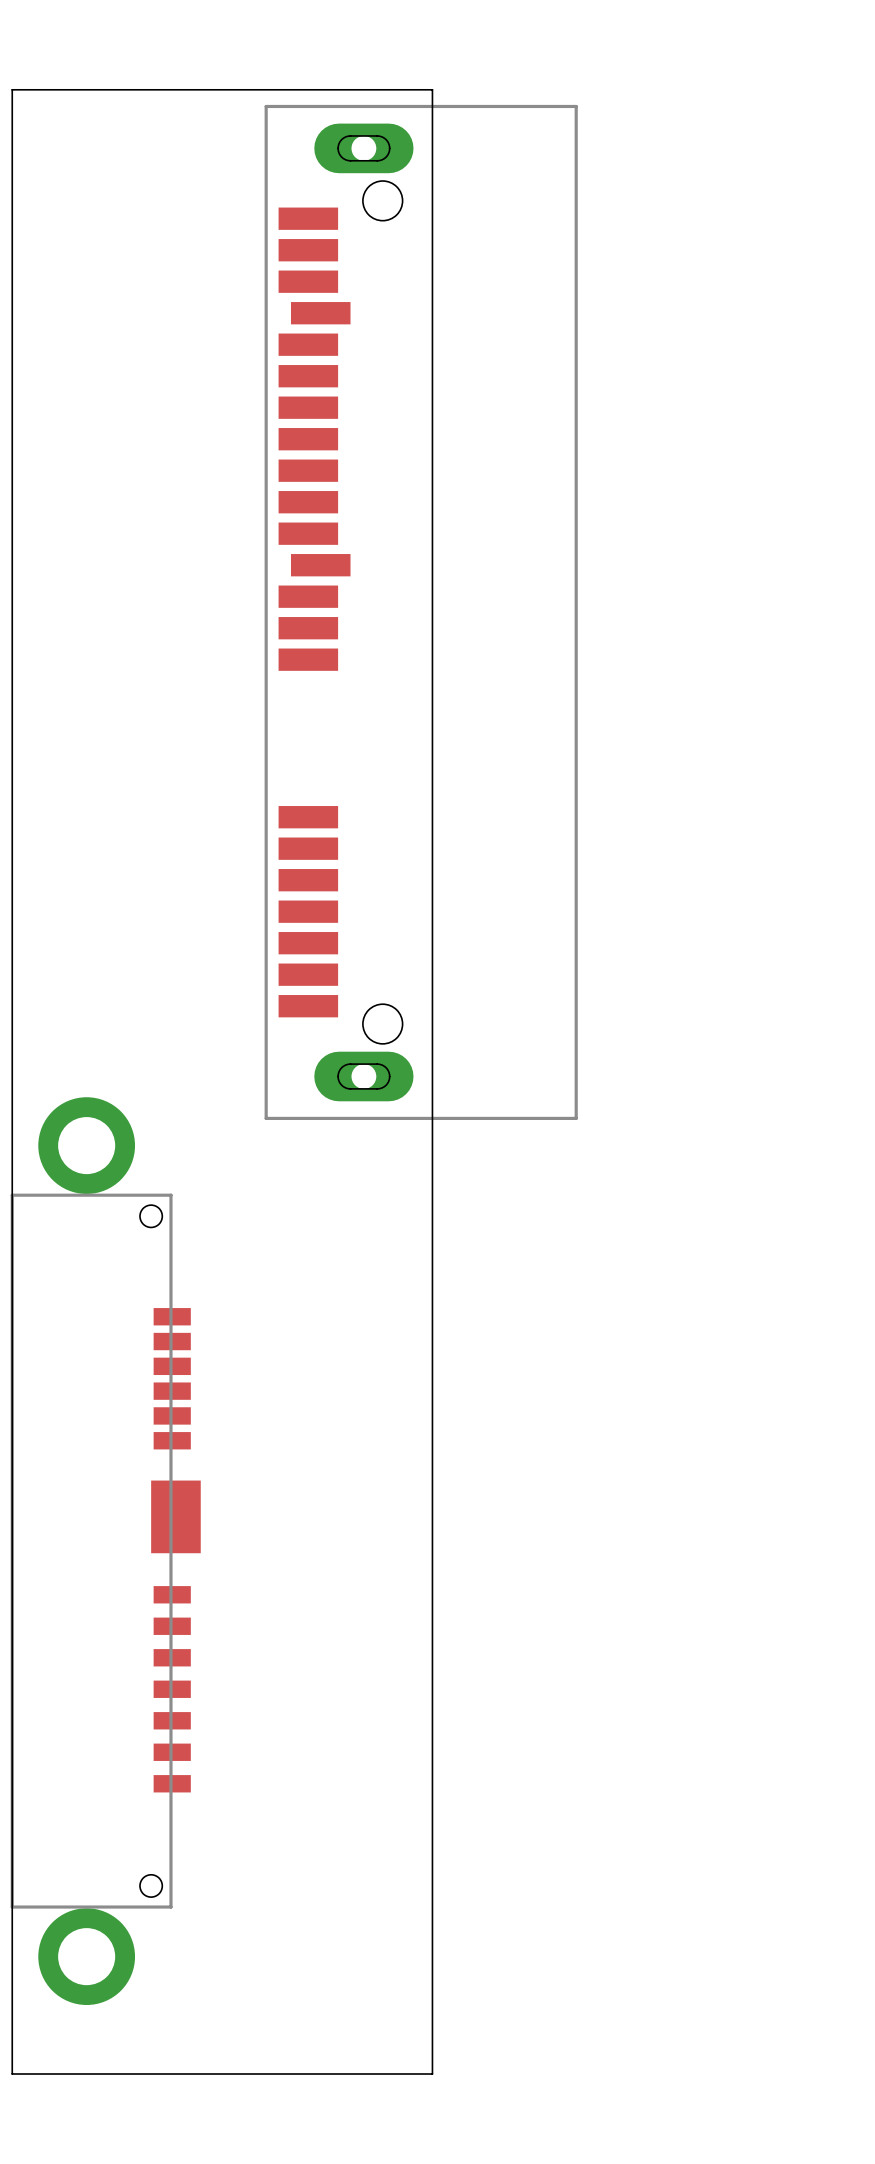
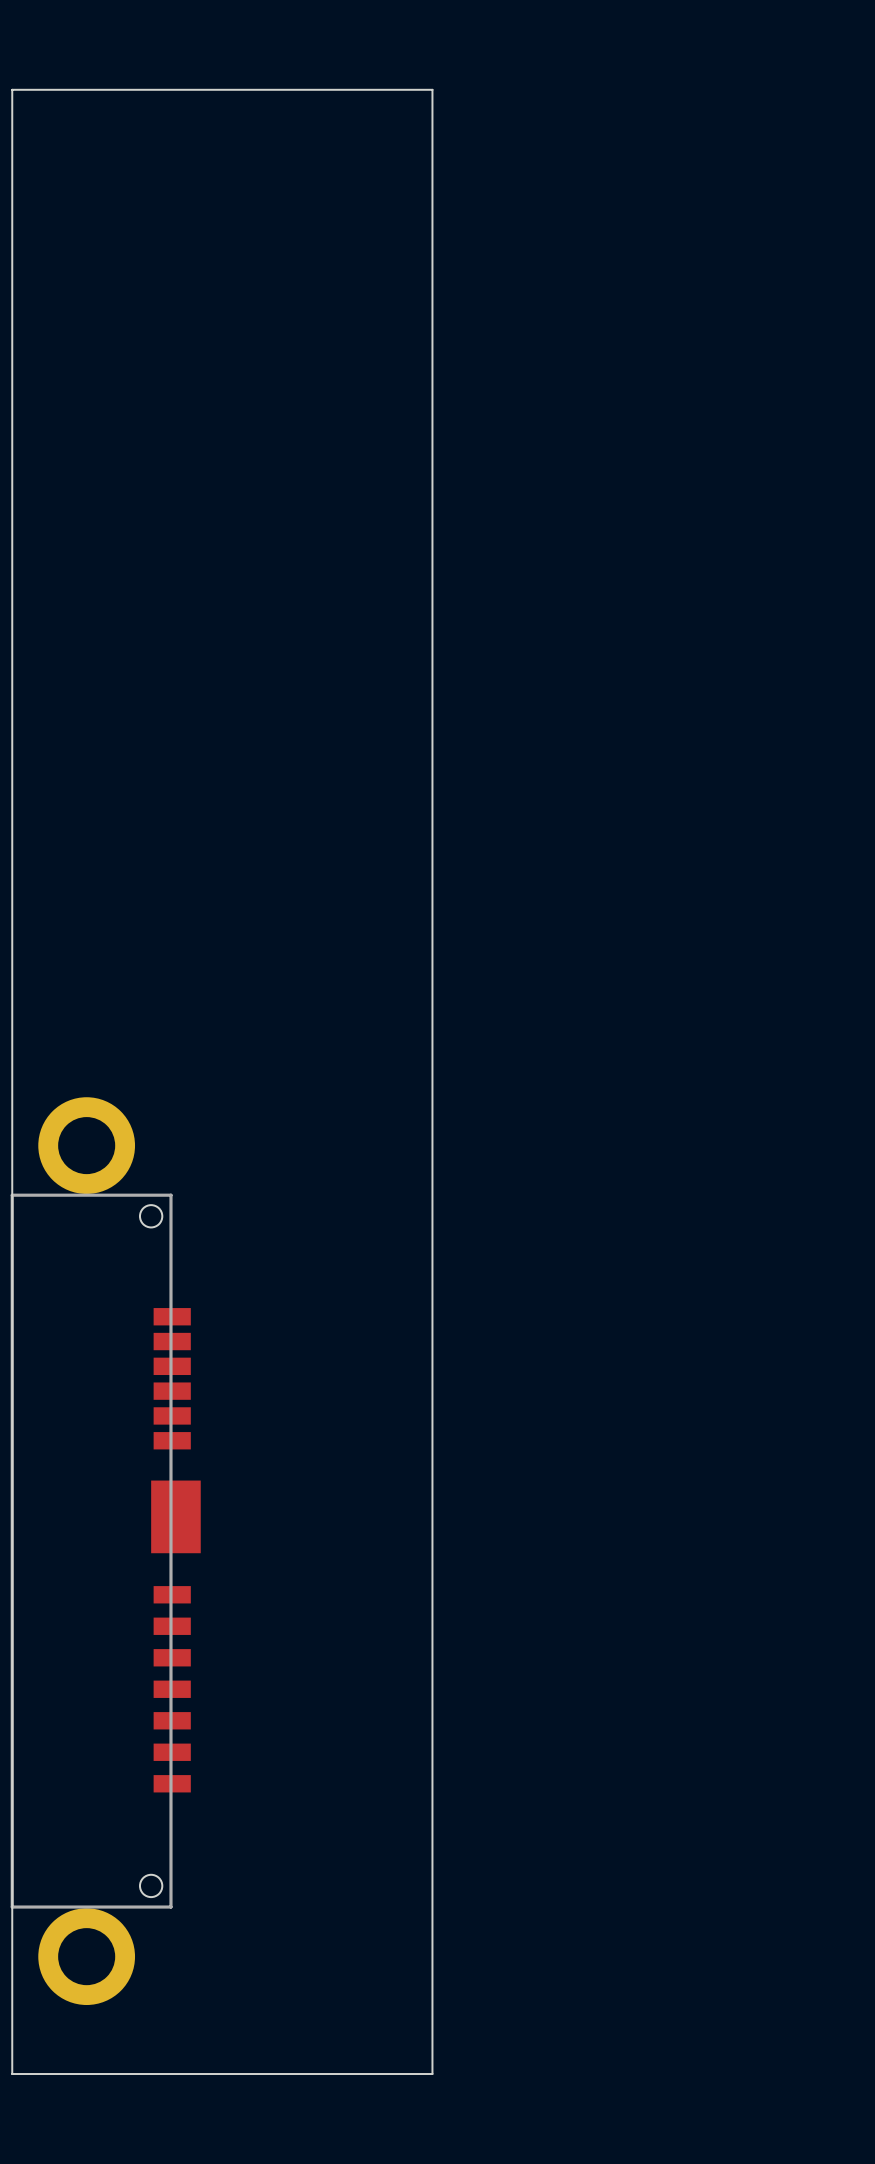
part: (421, 612) -> none

